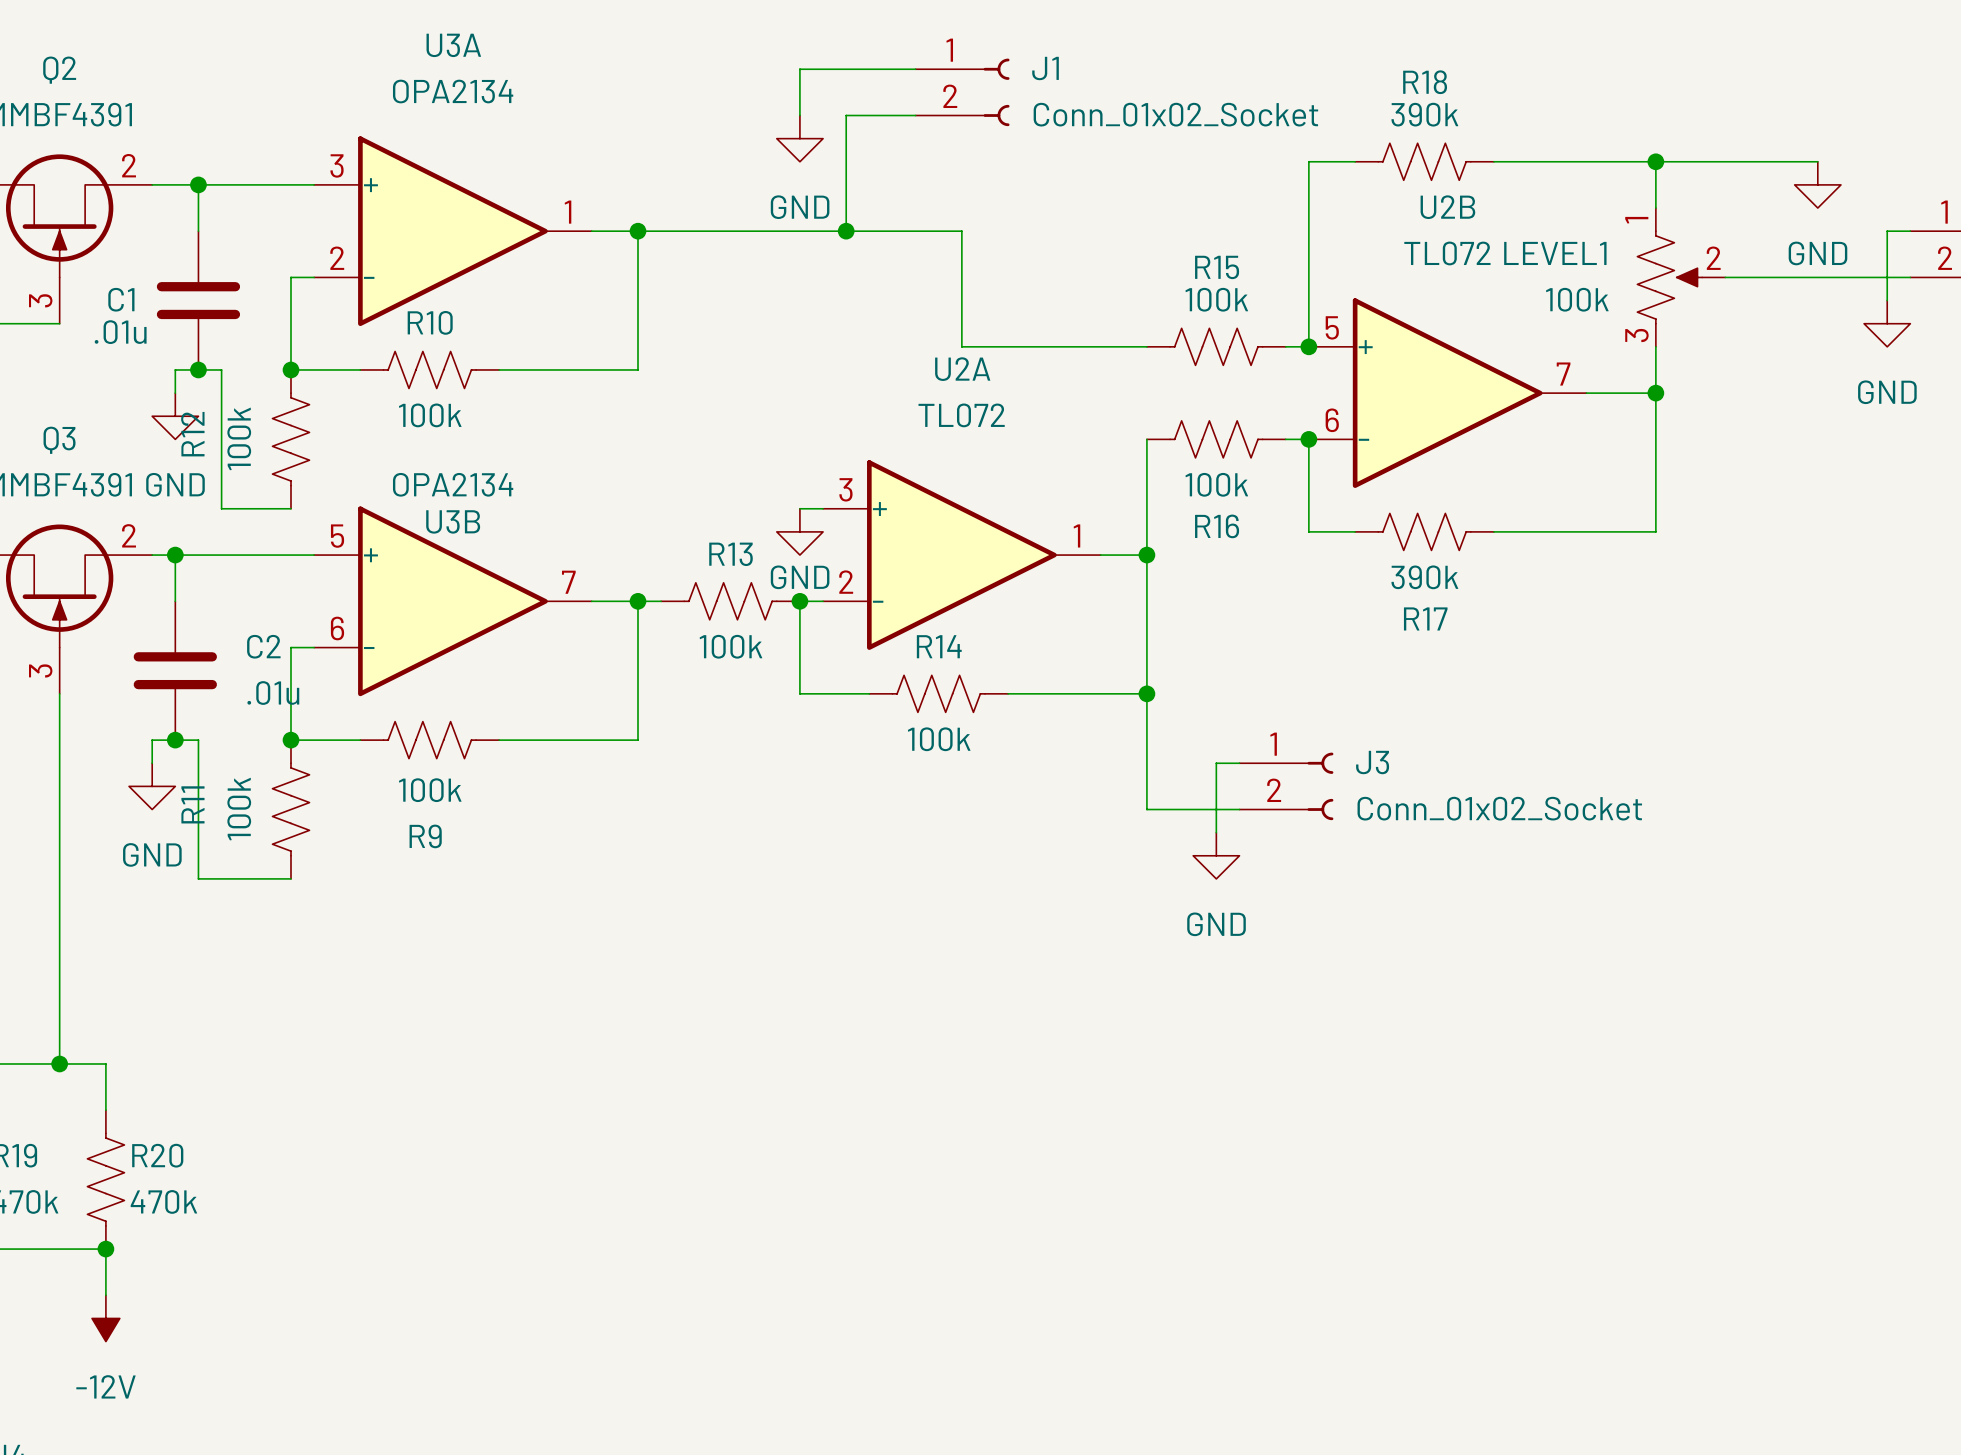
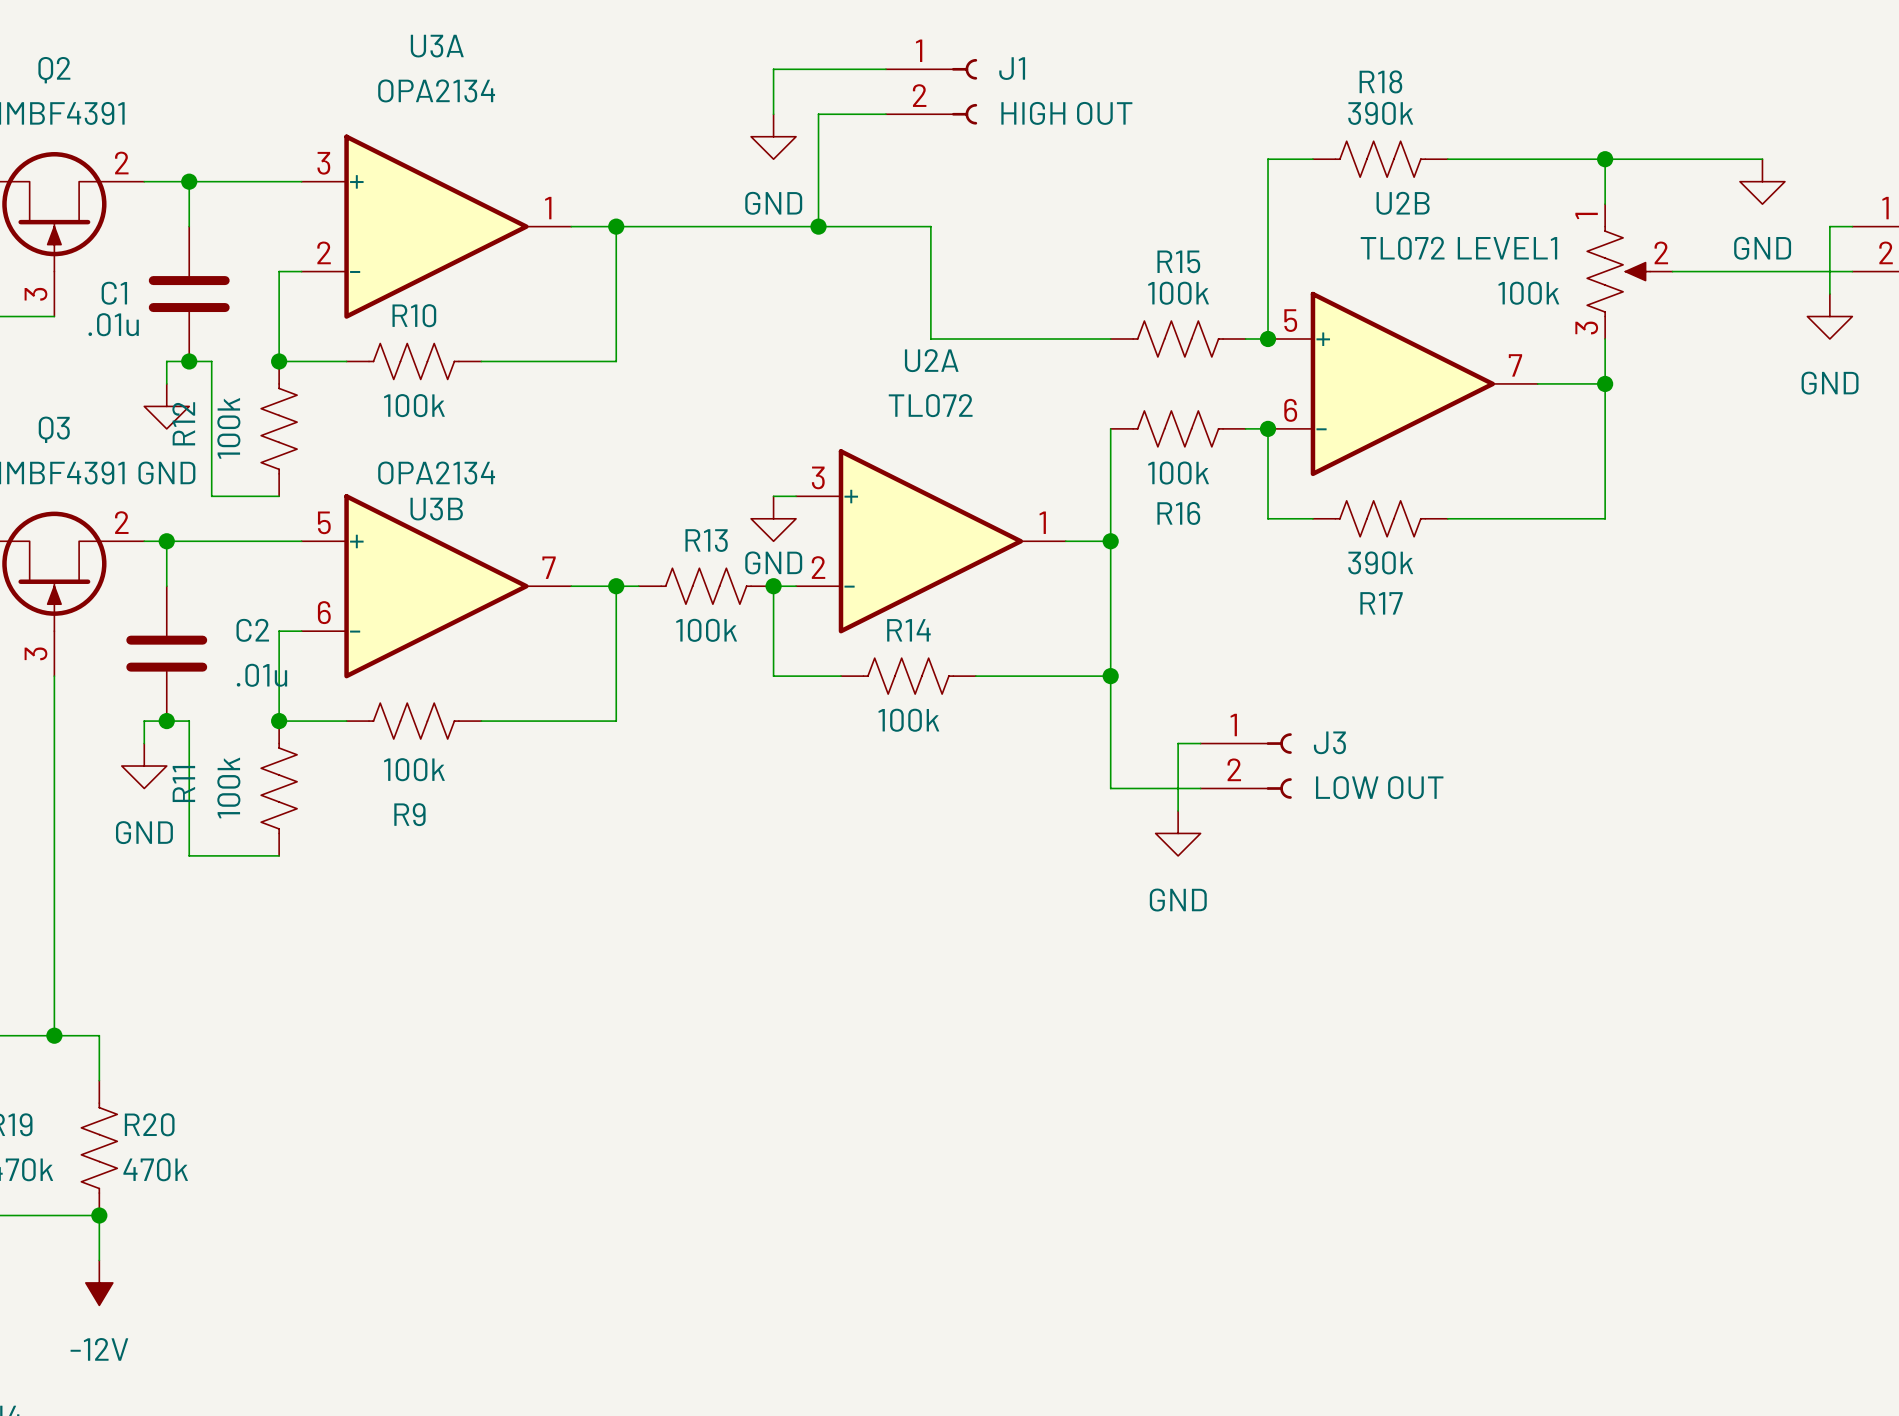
J1 value: Conn_01x02_Socket (1175, 114) -> HIGH OUT (1066, 113)
J3 value: Conn_01x02_Socket (1499, 808) -> LOW OUT (1379, 787)

